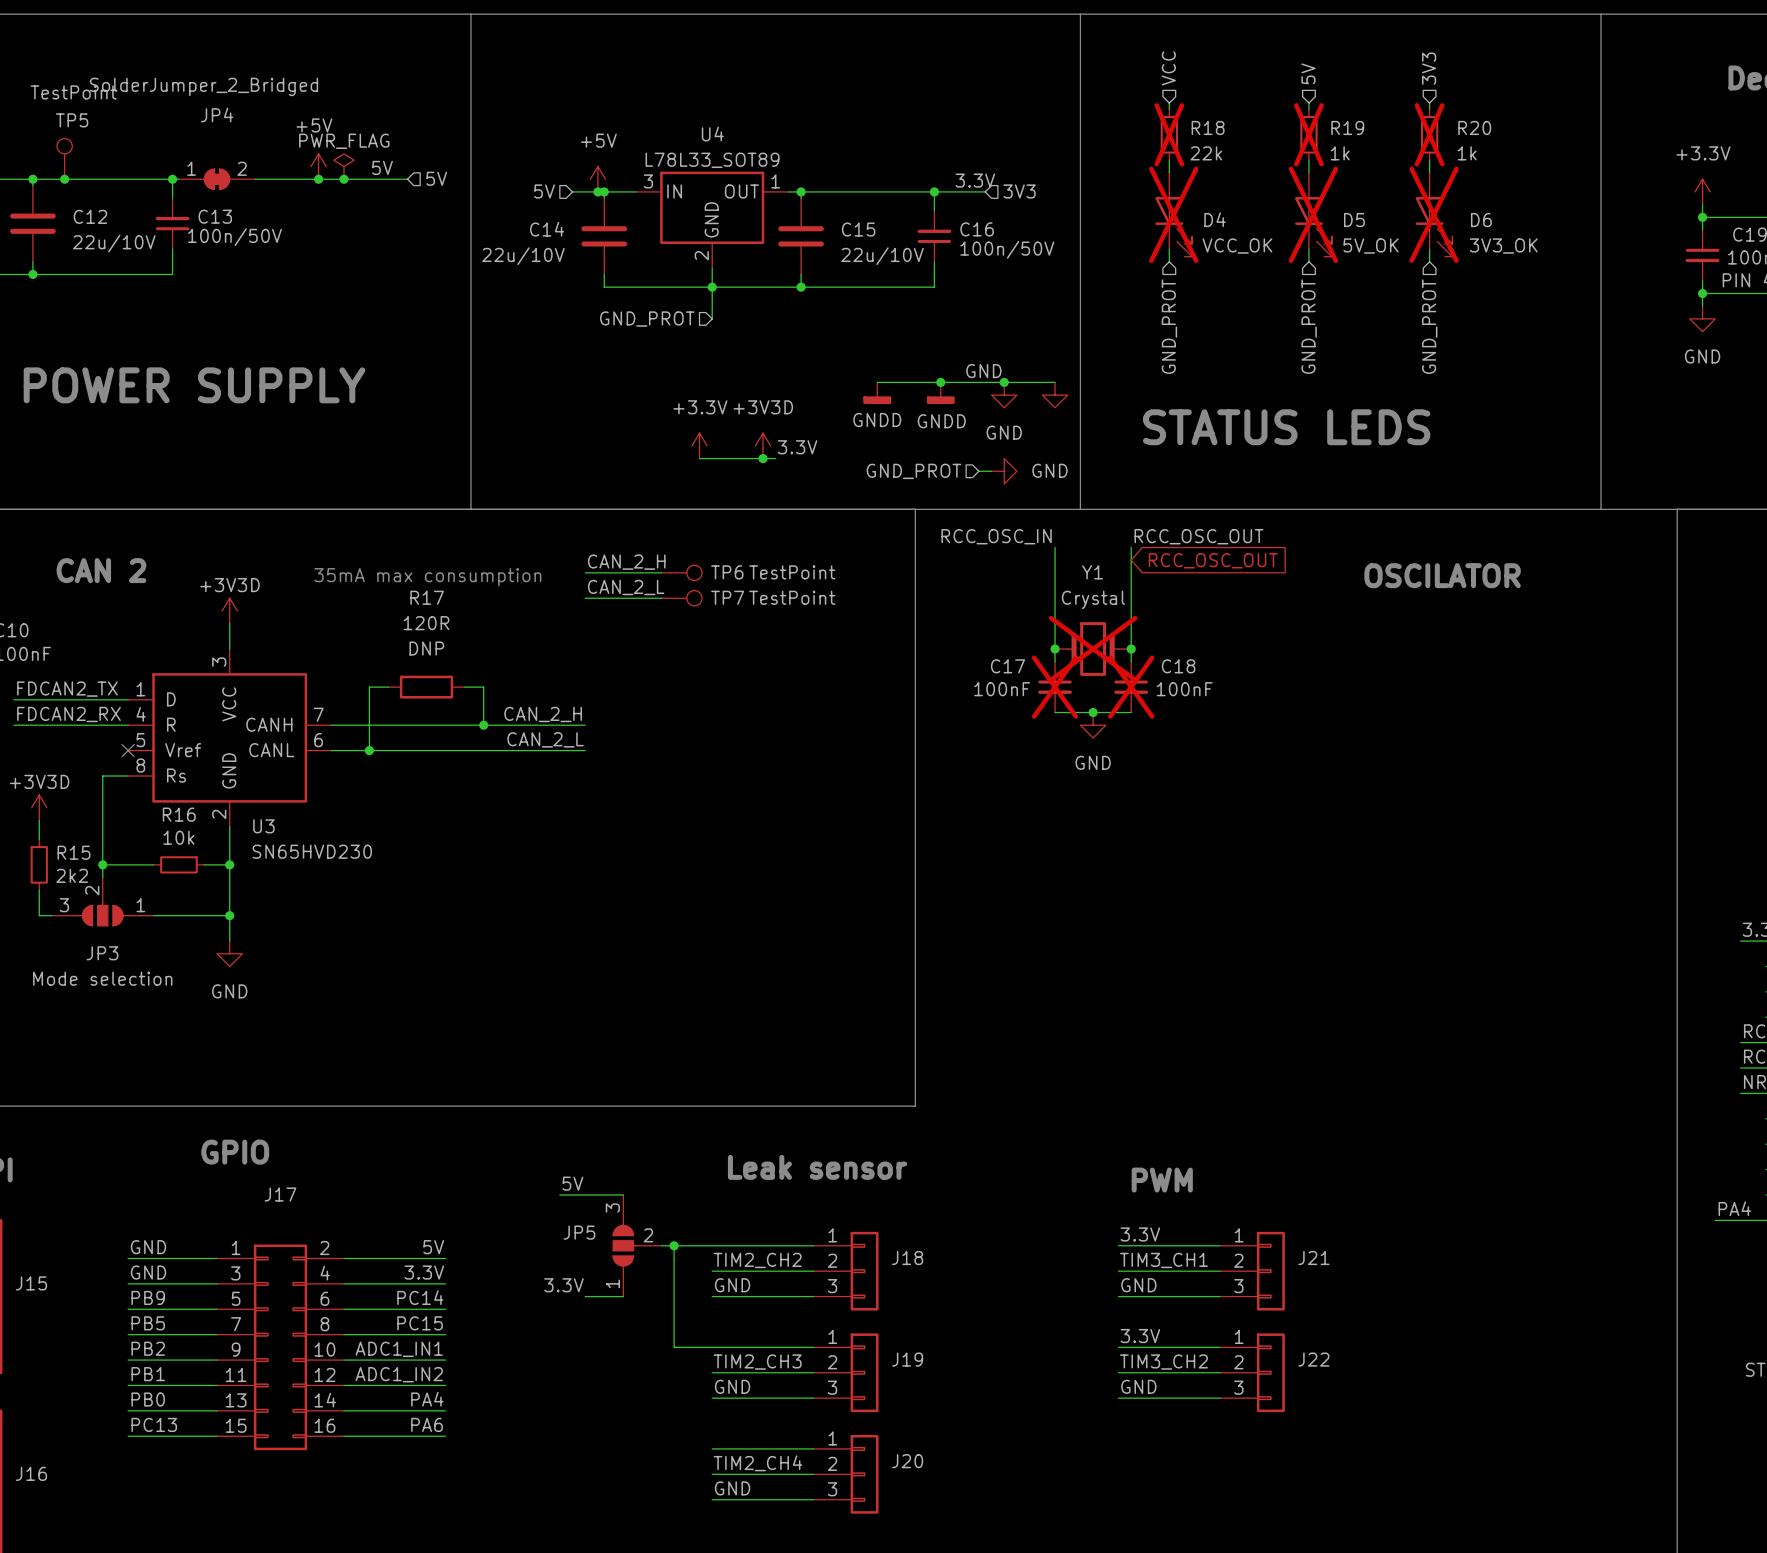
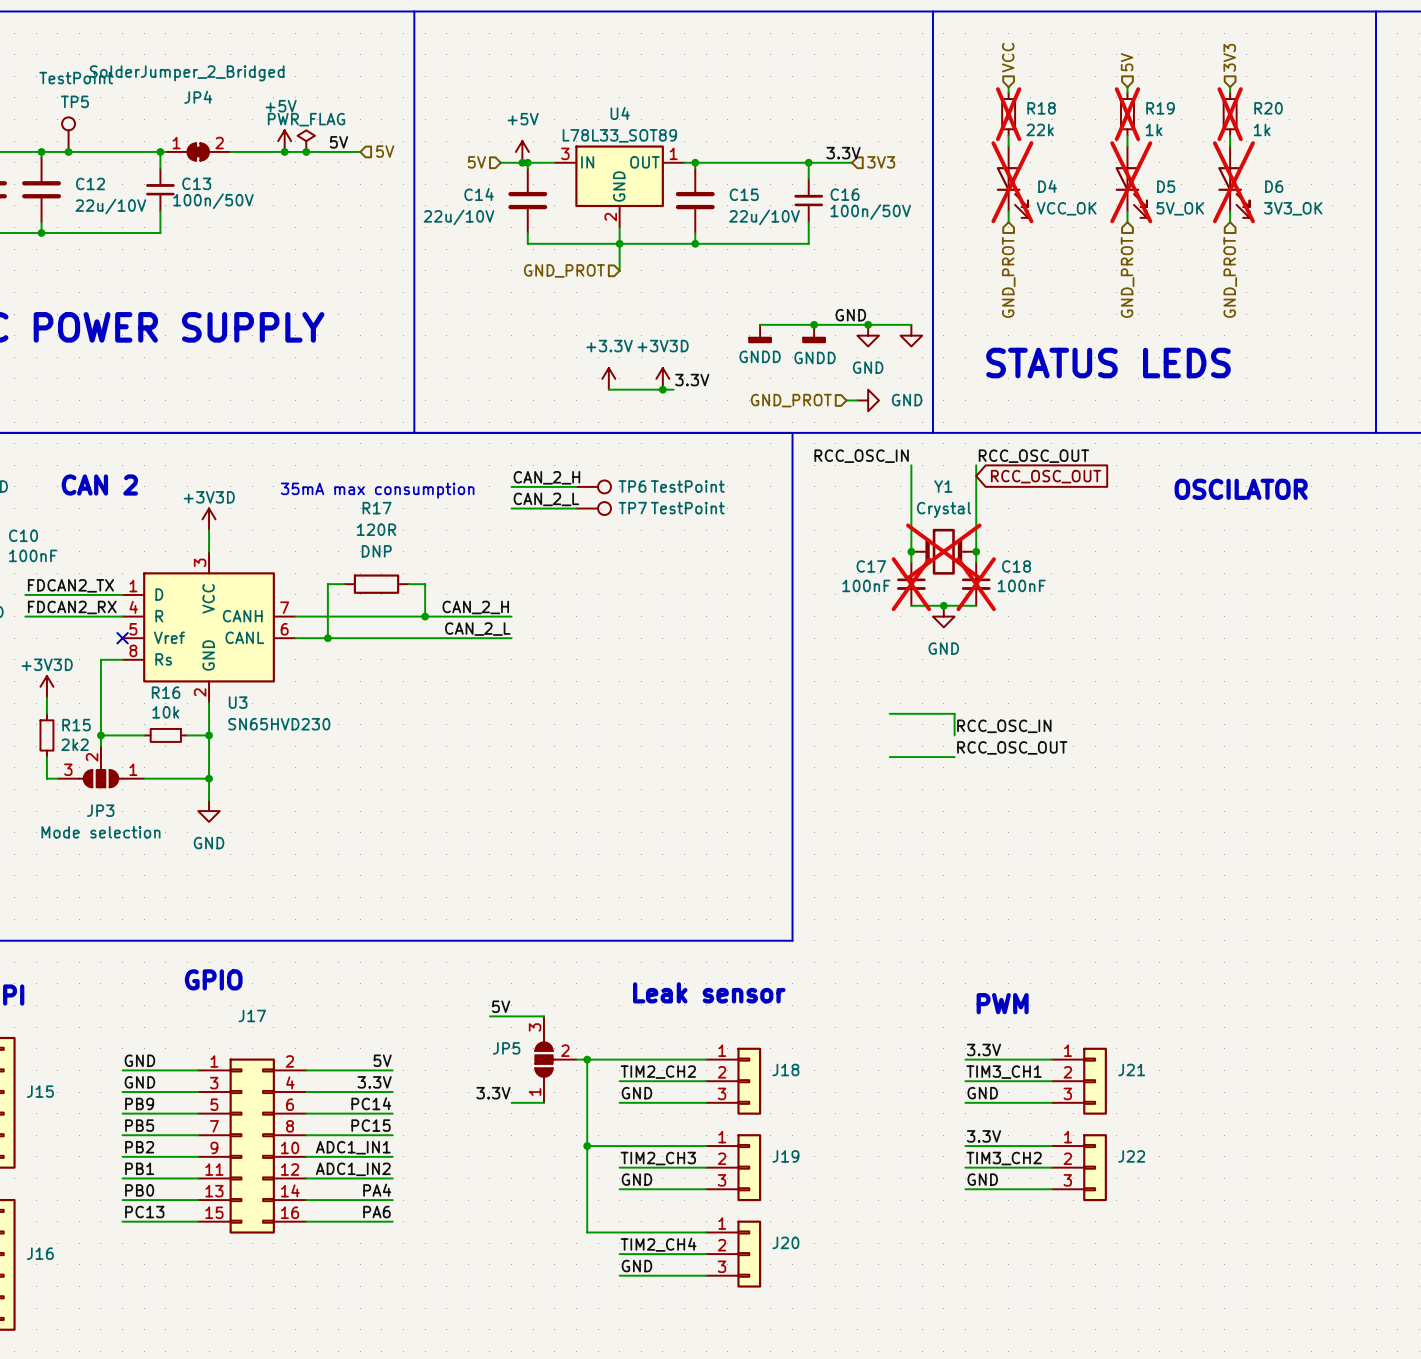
wire: none -> (889, 713) (954, 713) (954, 735)
label: none -> RCC_OSC_IN (1004, 726)
label: none -> RCC_OSC_OUT (1012, 747)
wire: none -> (889, 757) (954, 757)
wire: none -> (587, 1146) (587, 1232) (619, 1232)
junction: none -> (587, 1146)

